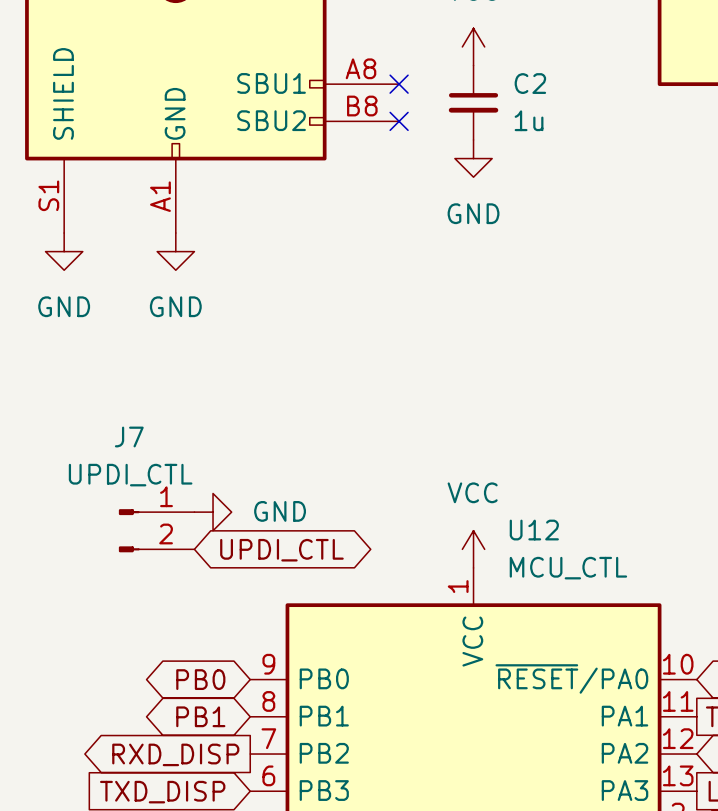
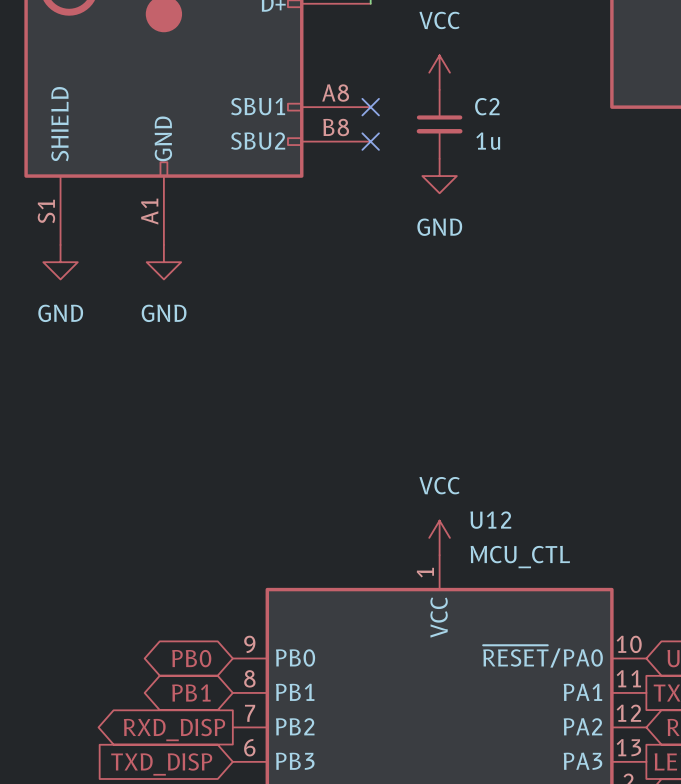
power symbol: GND (213, 512) -> none
J7: UPDI_CTL (156, 530) -> none
global label: UPDI_CTL (281, 550) -> none

